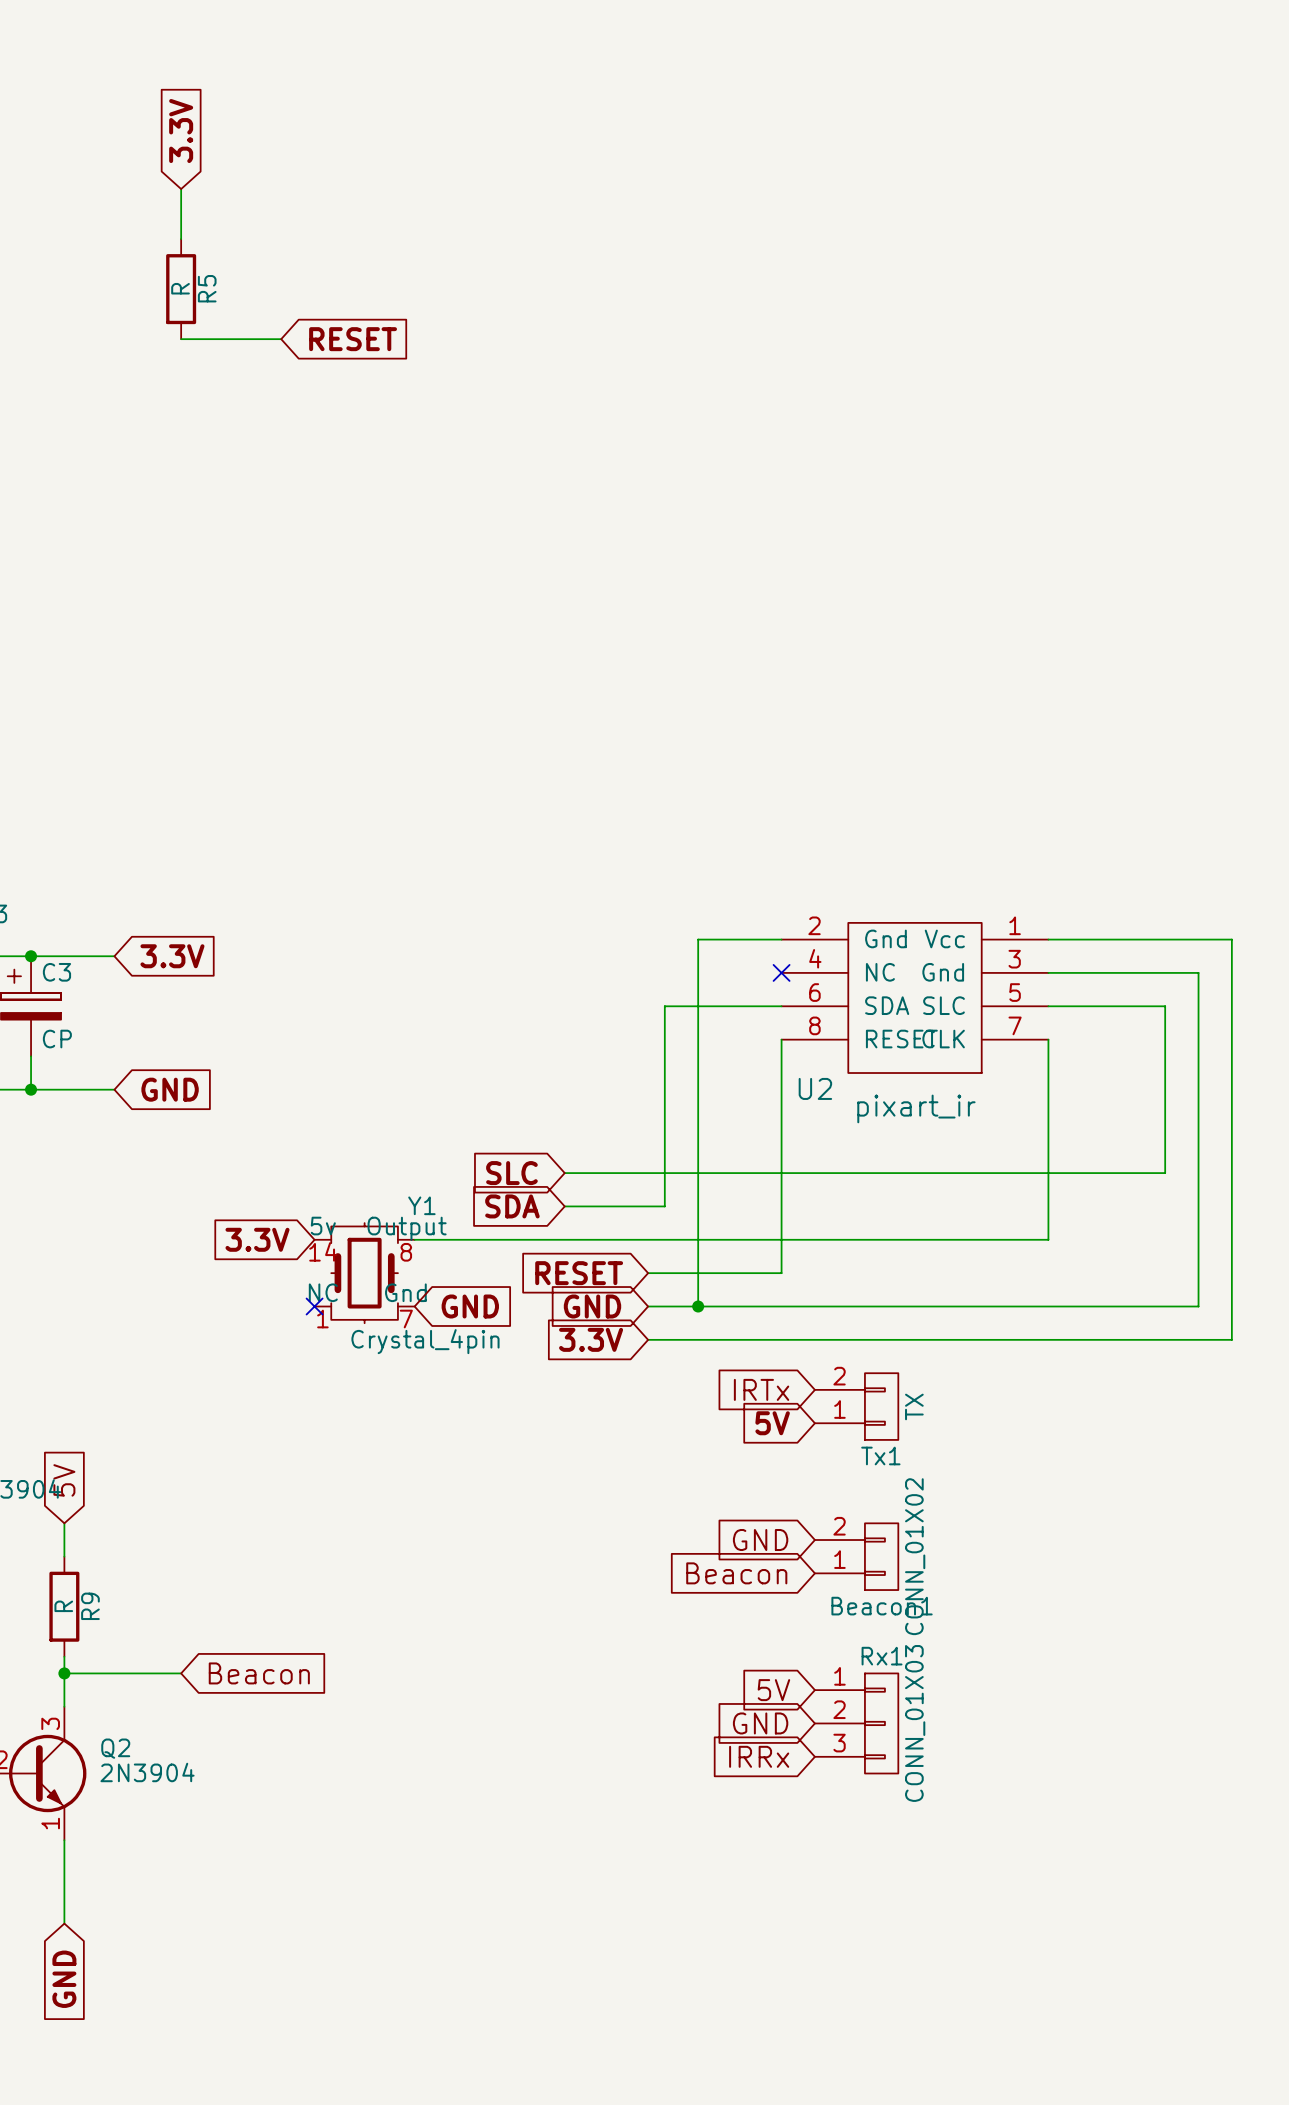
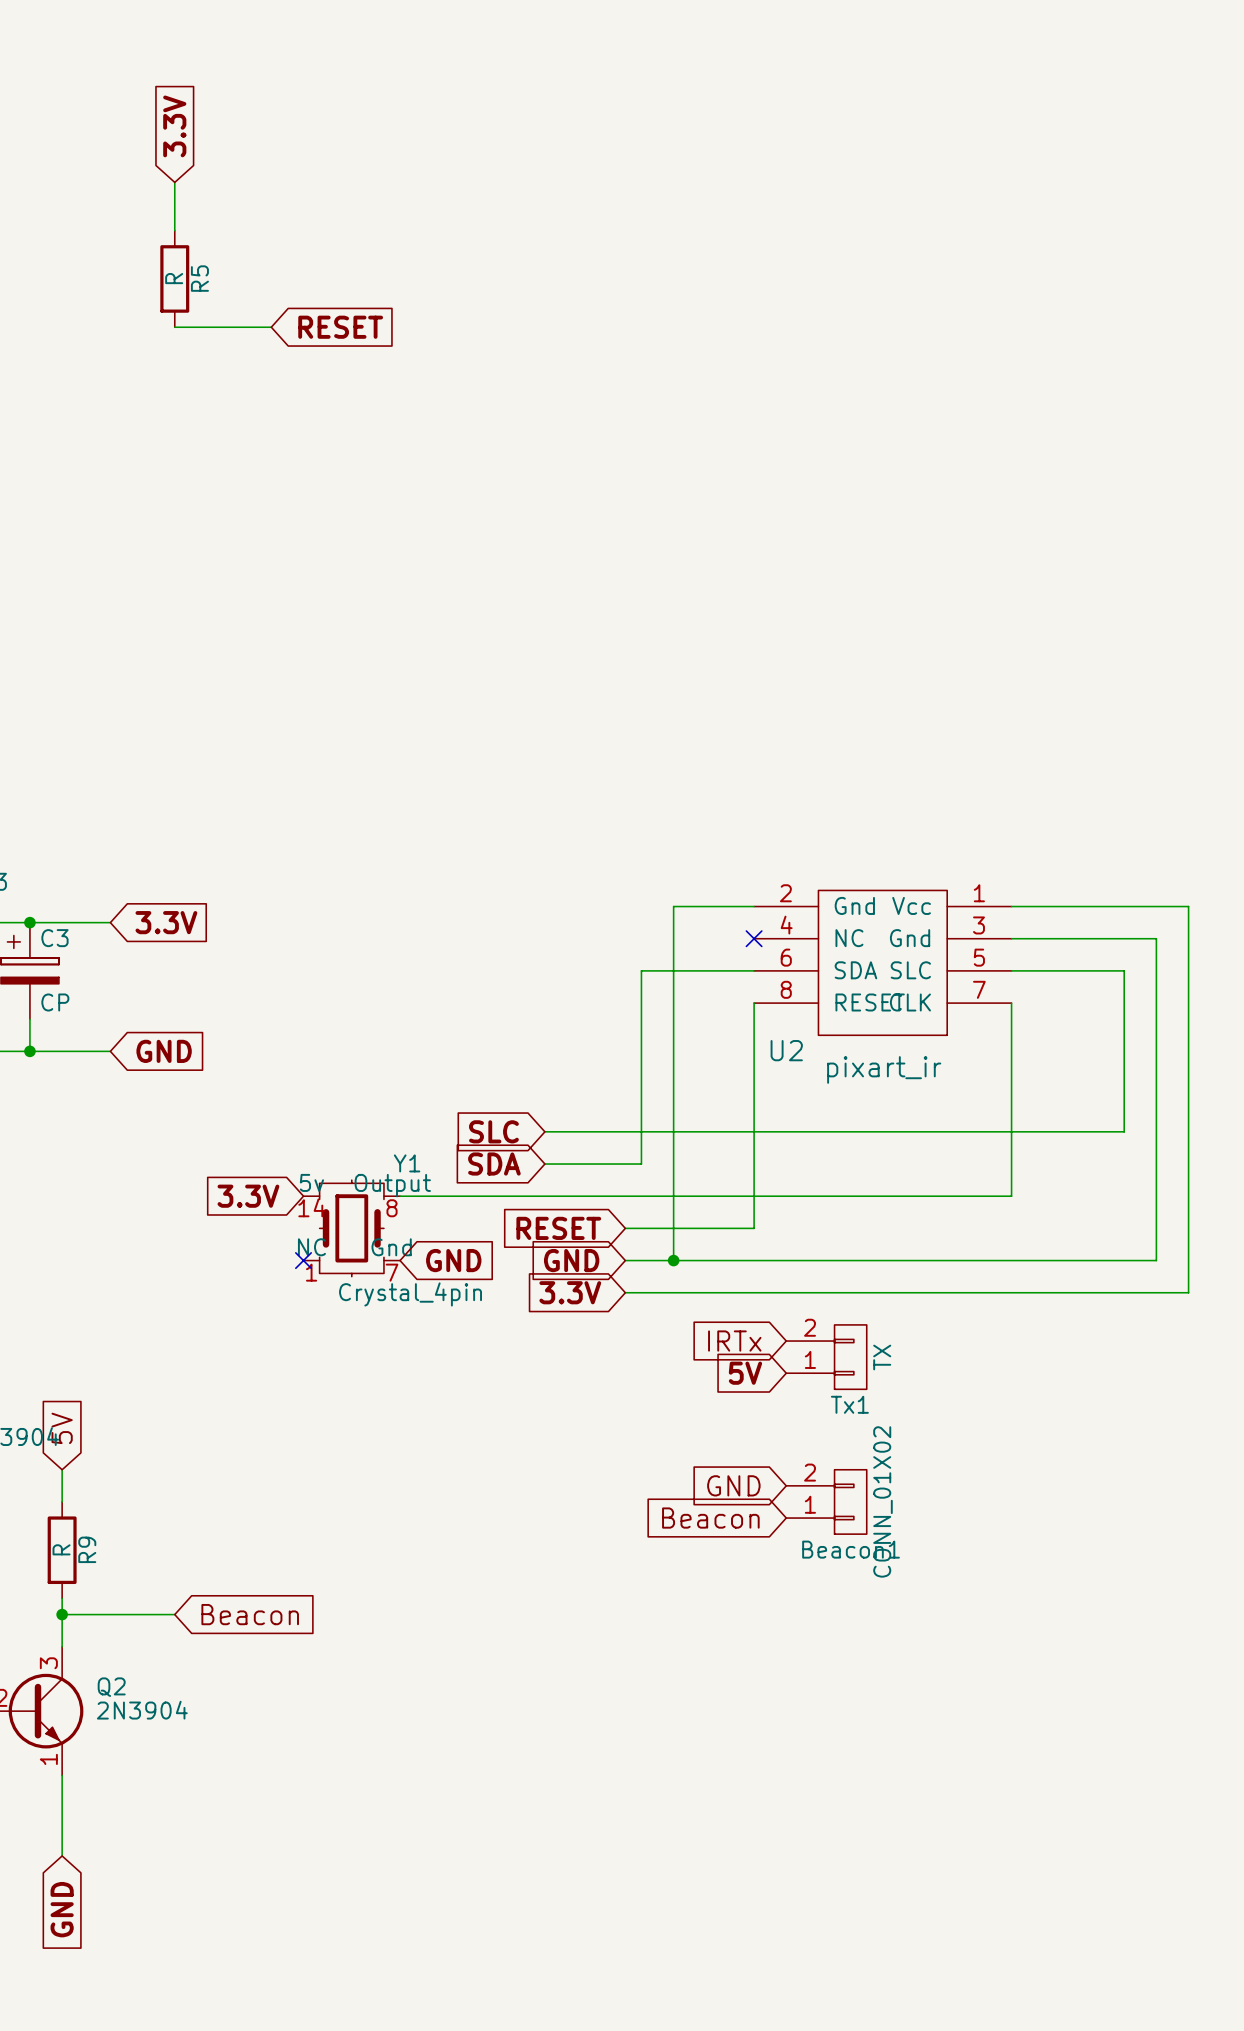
global label: 5V (773, 1690) -> none
global label: GND (760, 1723) -> none
Rx1: CONN_01X03 (856, 1723) -> none
global label: IRRx (759, 1756) -> none

